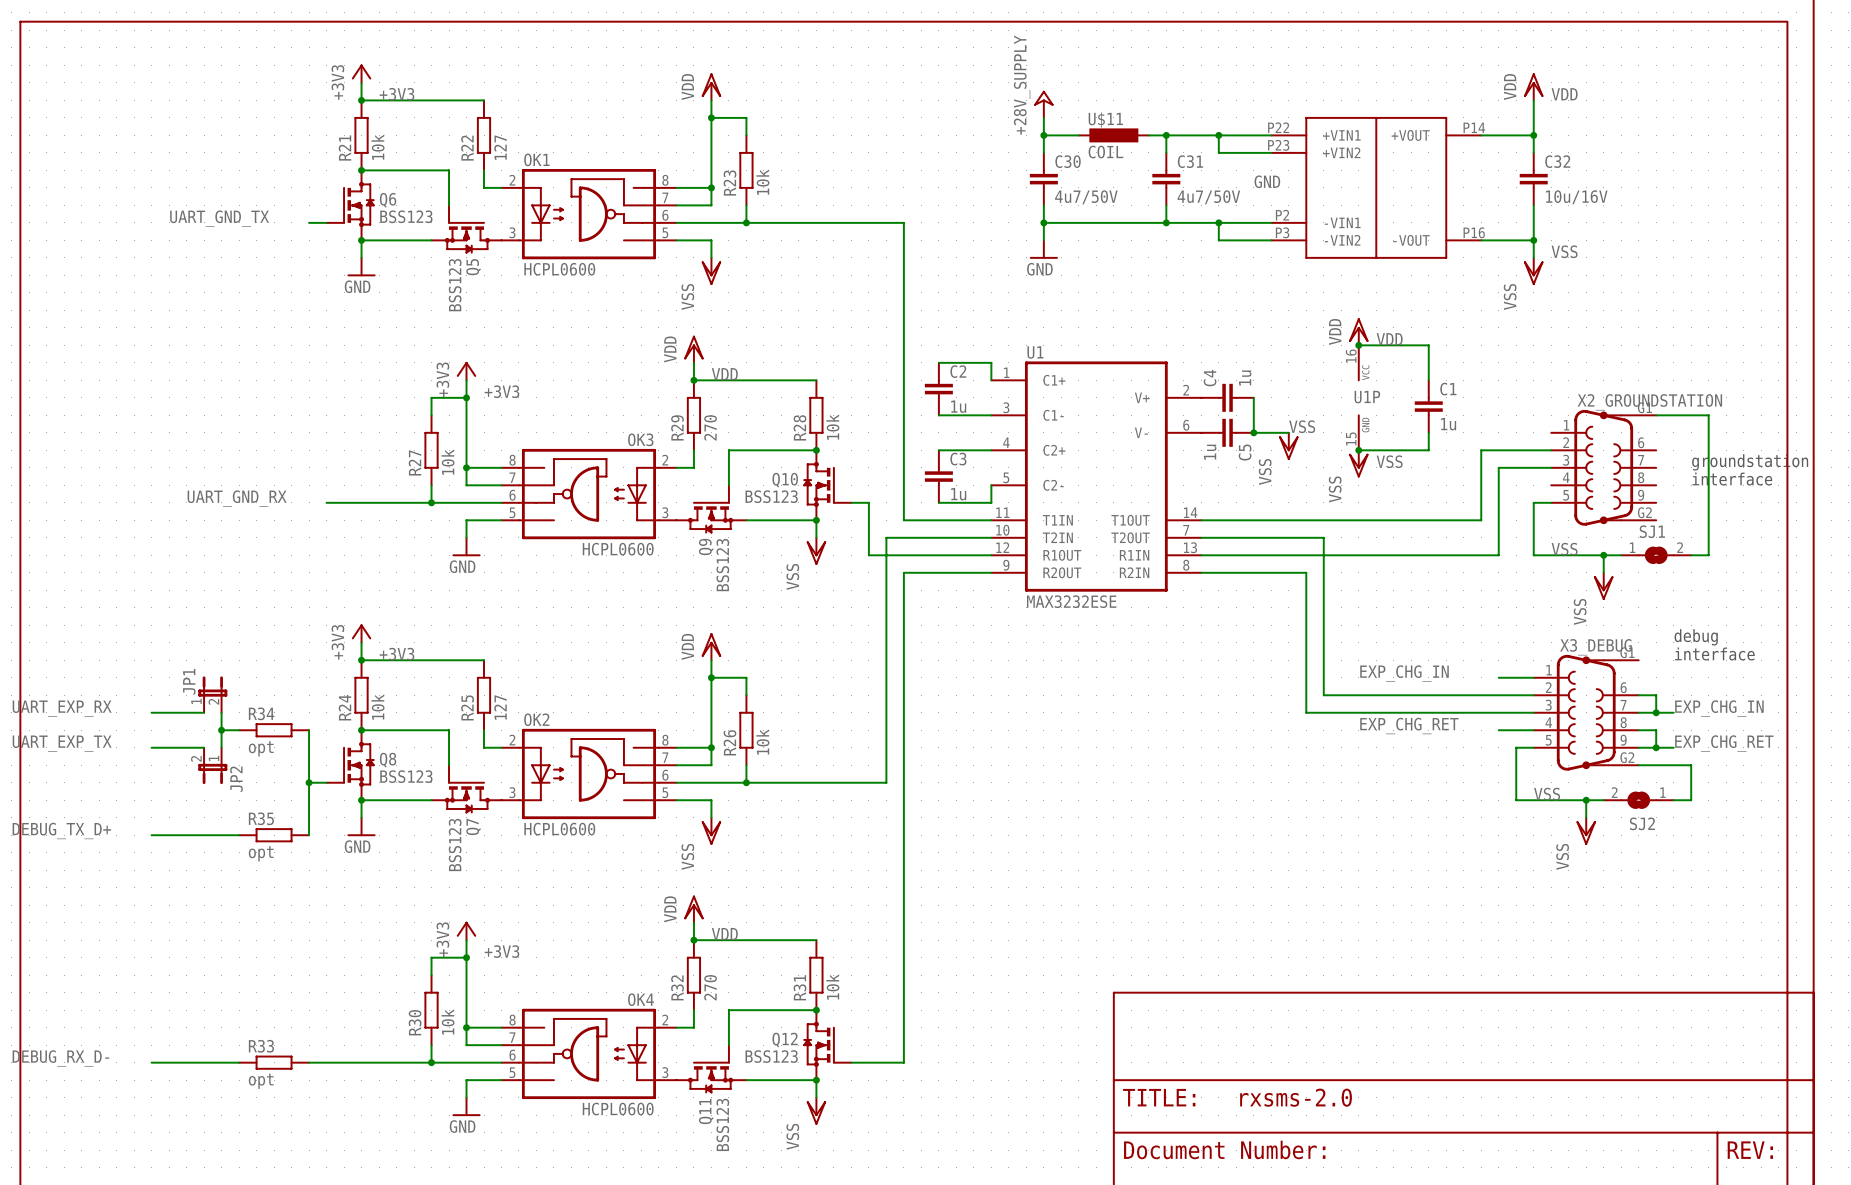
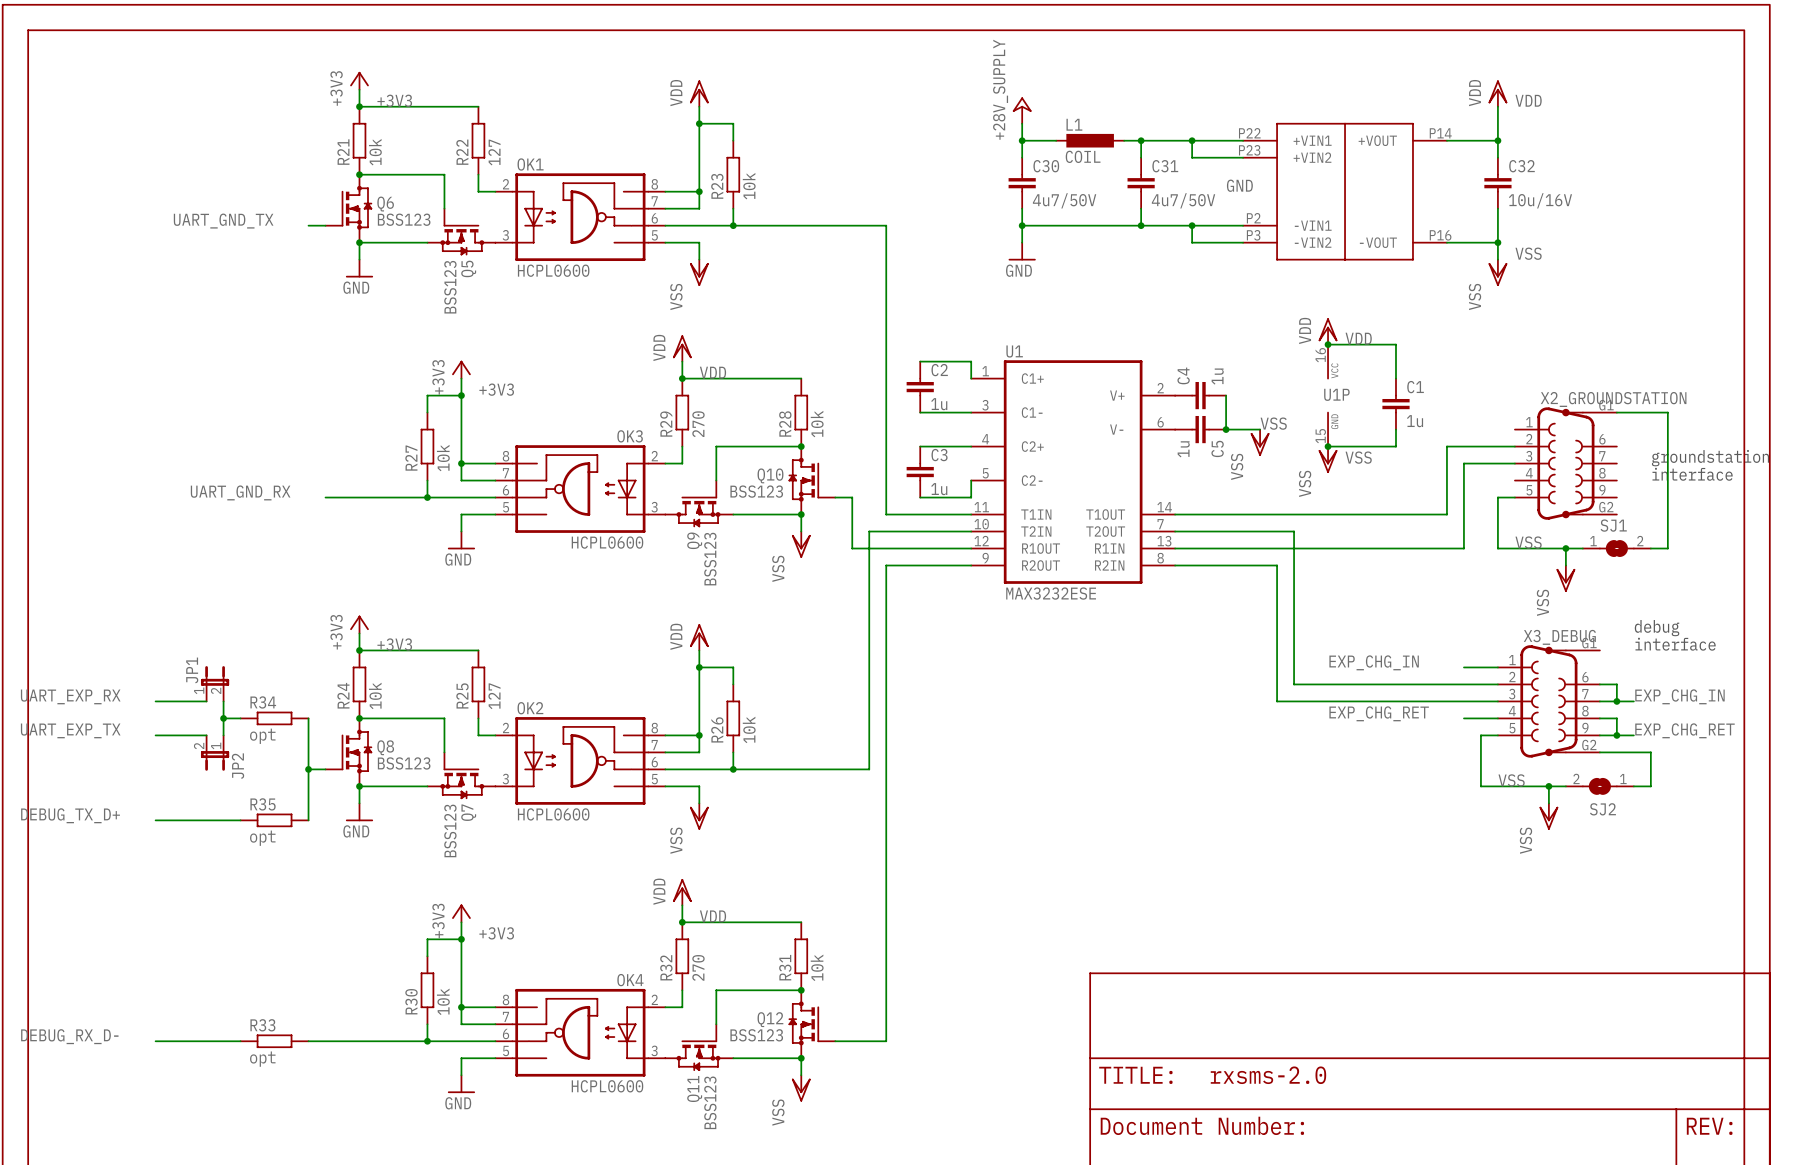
U$11 name: U$11 (1105, 119) -> L1 (1074, 124)

